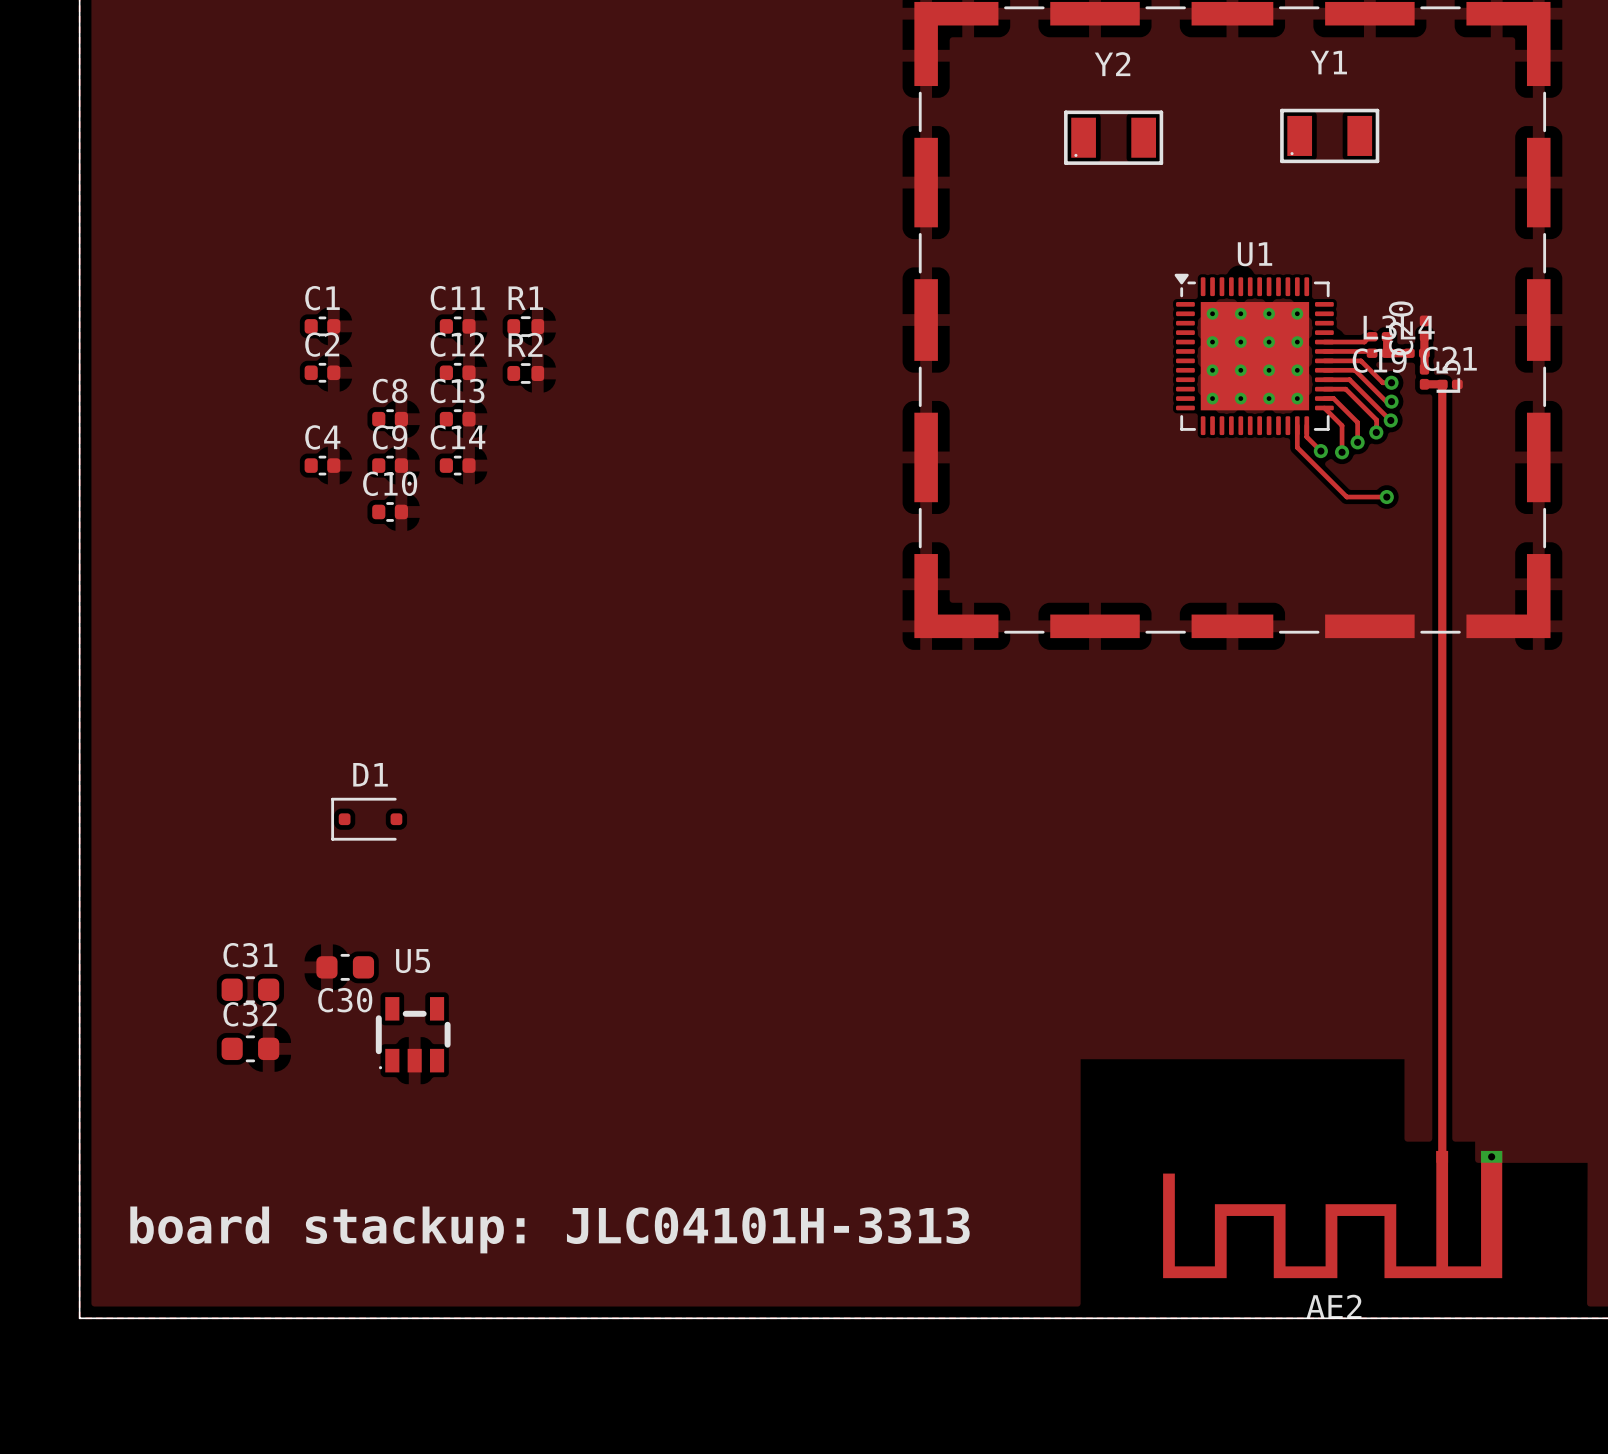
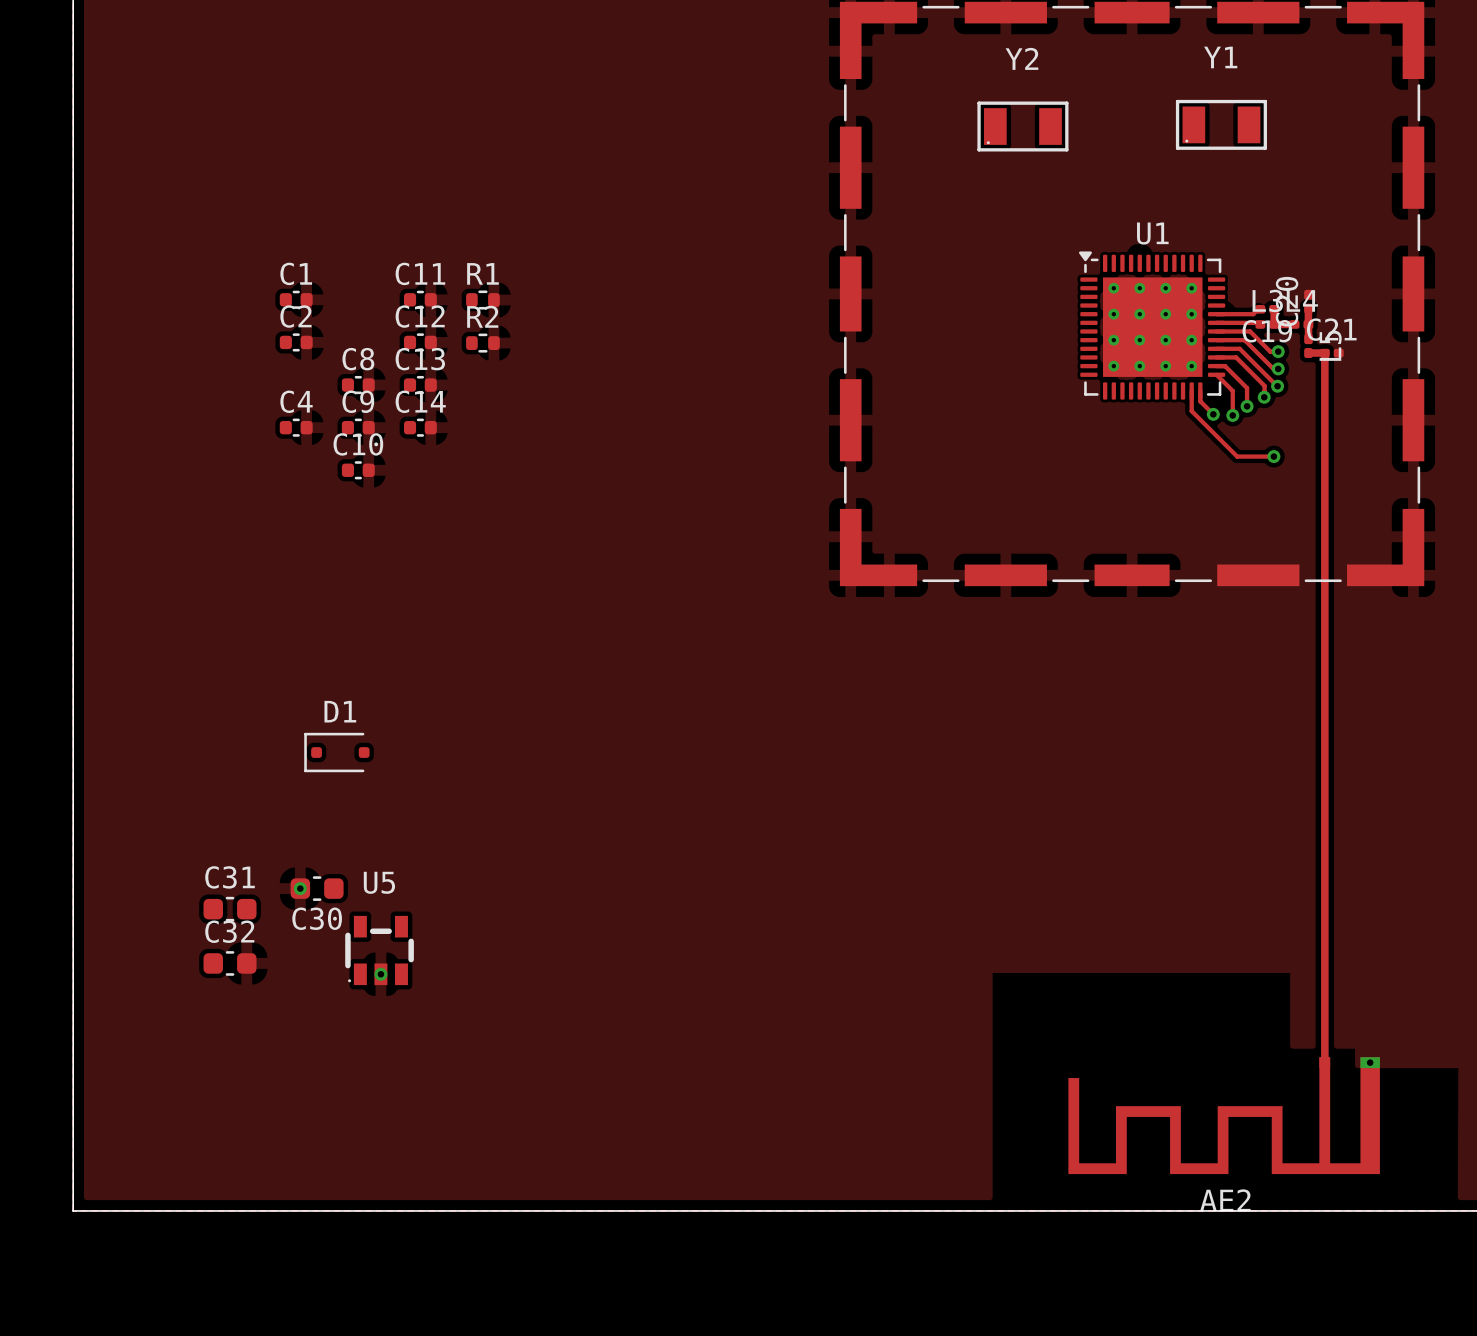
via: none -> (300, 888)
via: none -> (380, 974)
text: board stackup: JLC04101H-3313 (549, 1229) -> none

